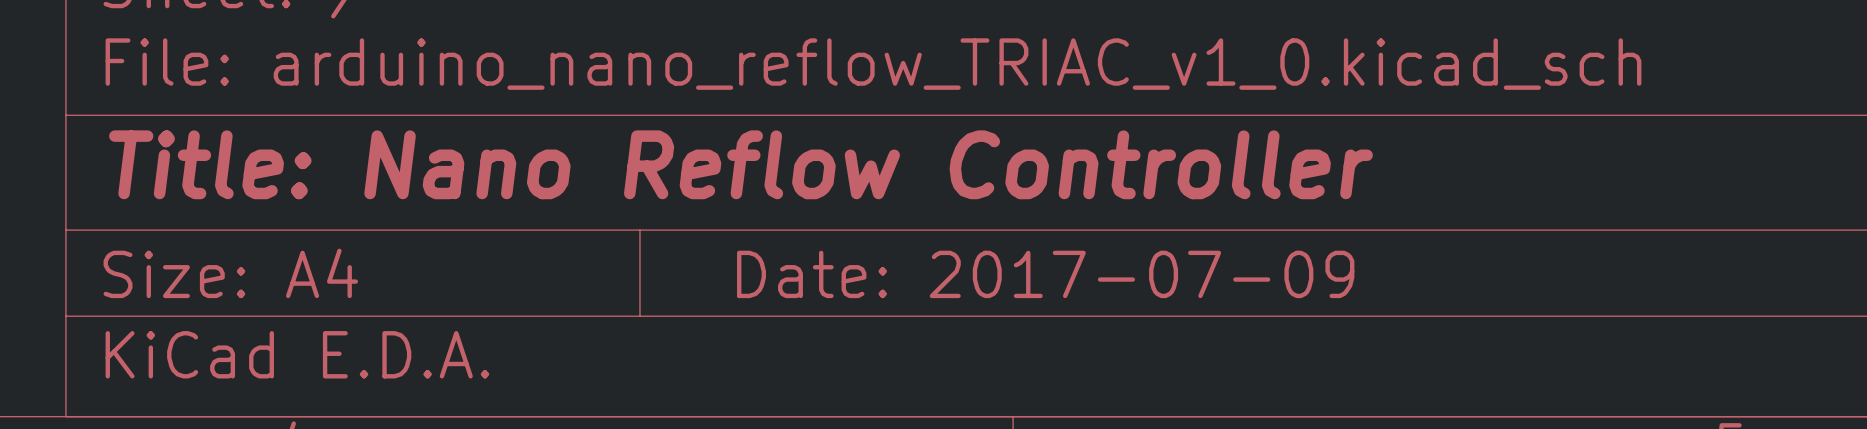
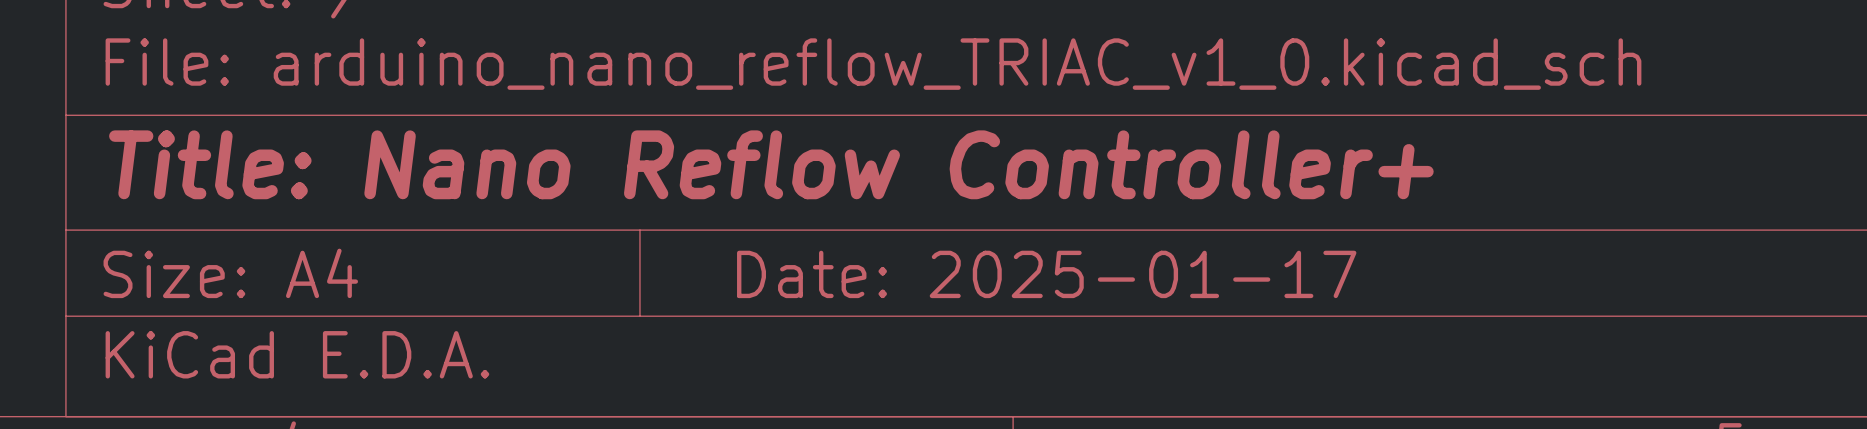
title block: Title: Nano Reflow Controller (740, 164) -> Title: Nano Reflow Controller+ (771, 164)
title block: Date: 2017-07-09 (1045, 274) -> Date: 2025-01-17 (1046, 274)

